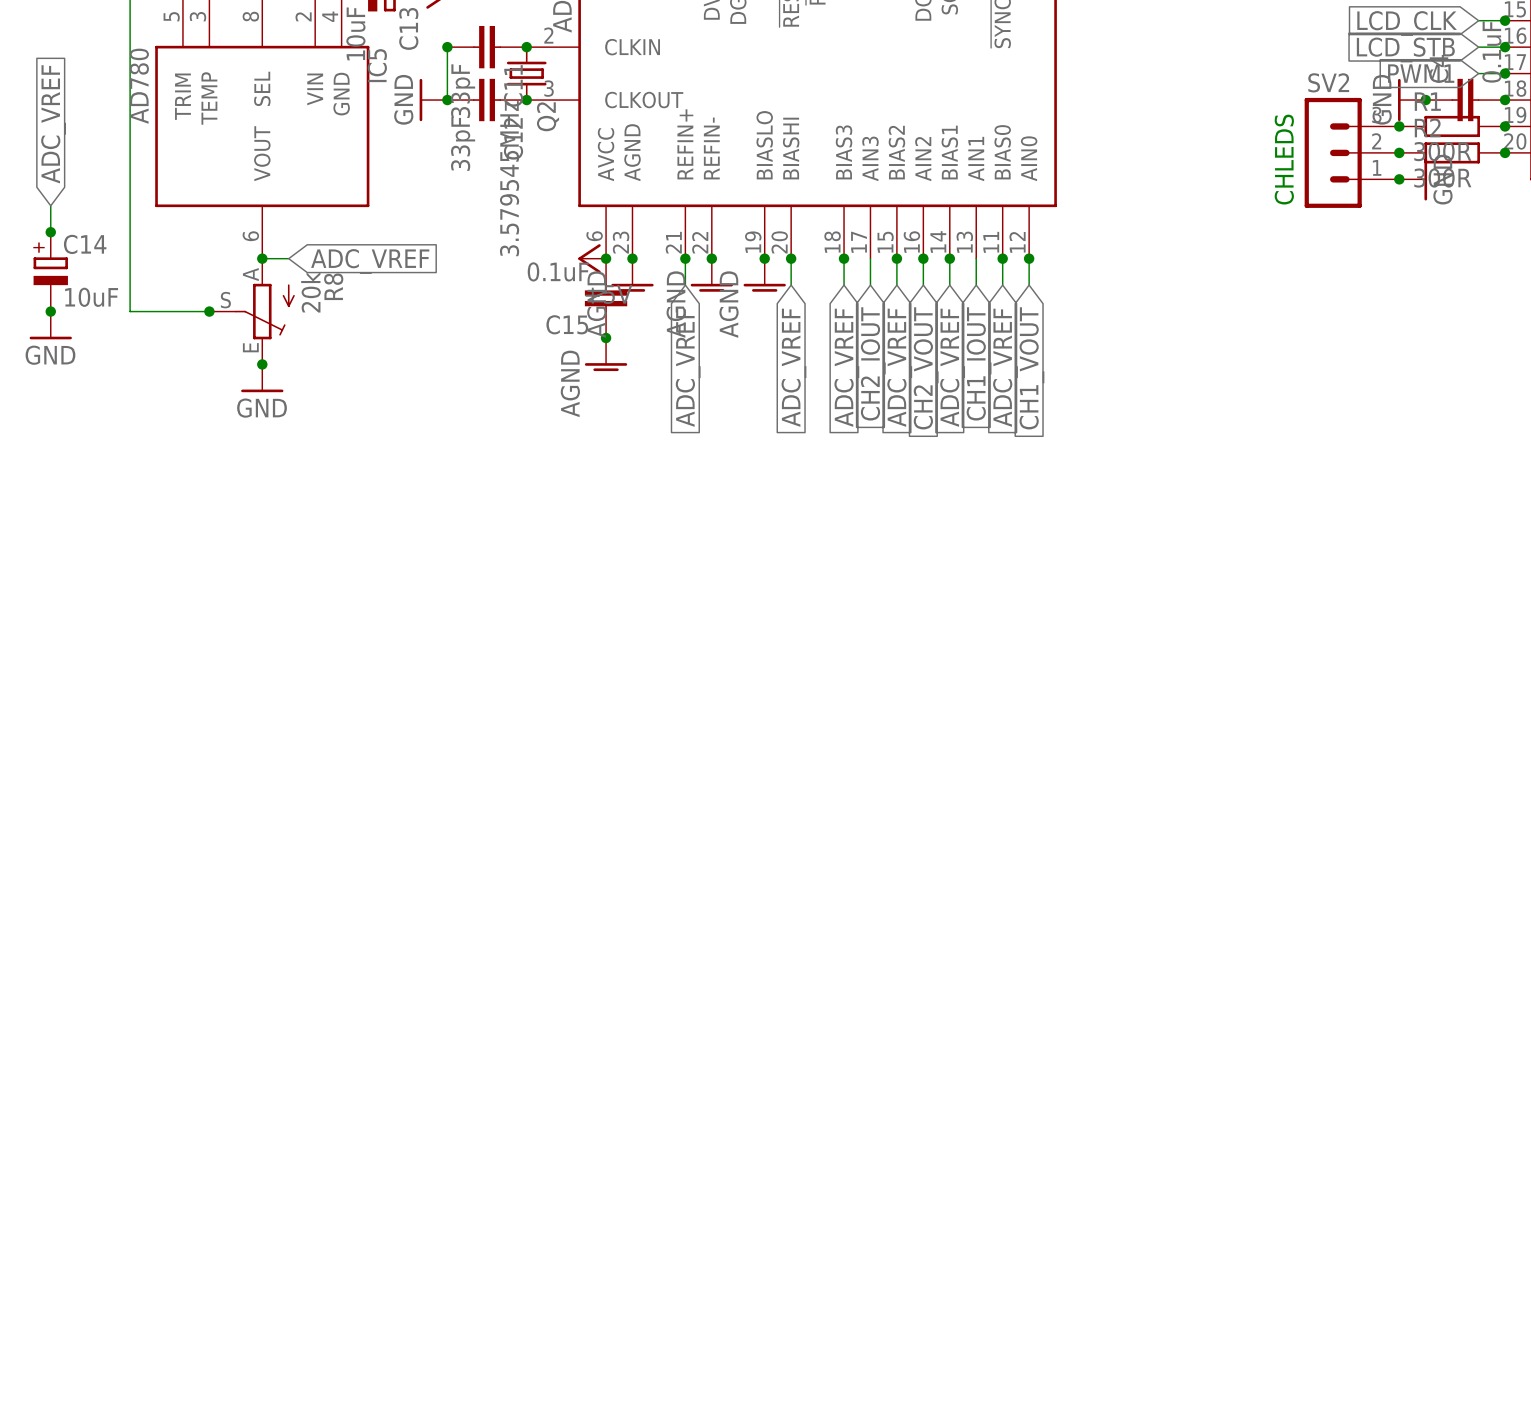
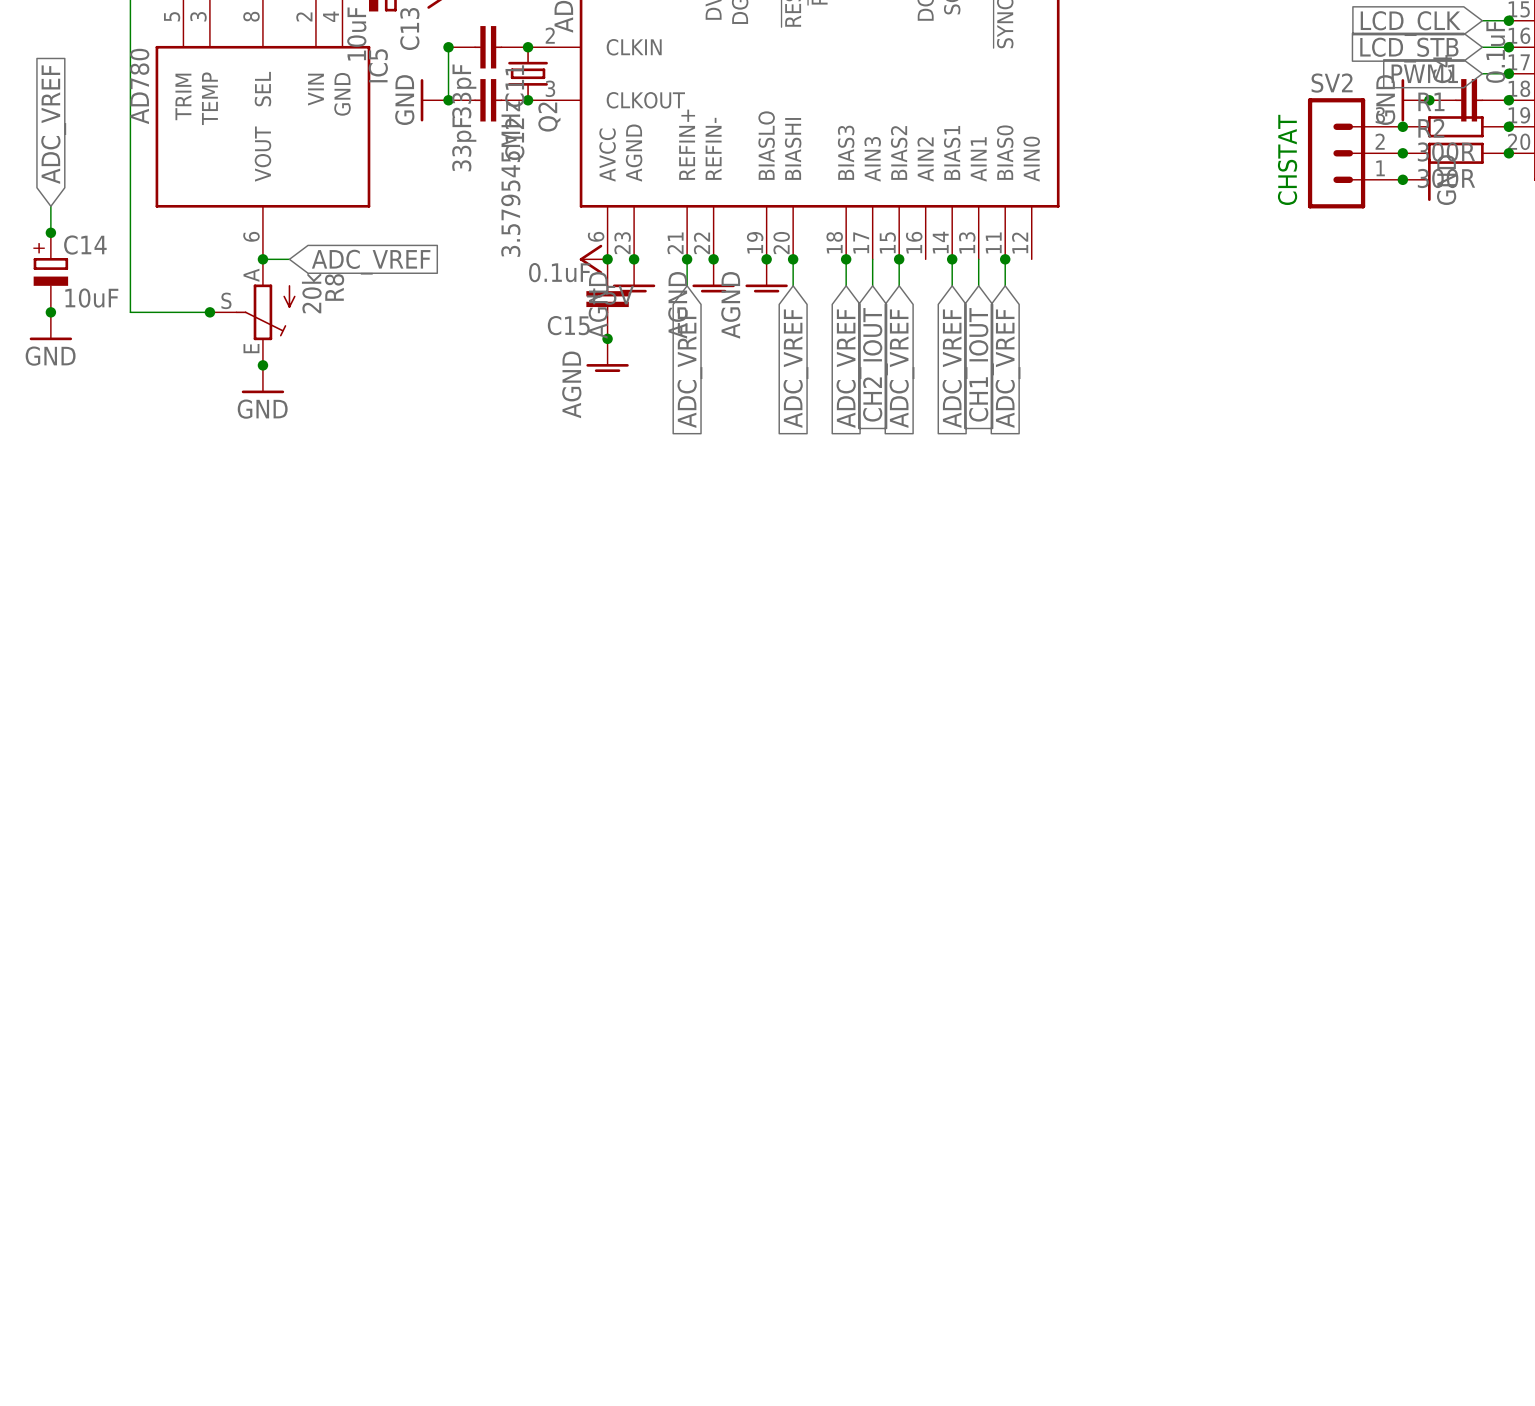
text: CHLEDS (1284, 159) -> CHSTAT (1287, 159)
wire: (923, 258) (923, 285) -> none
junction: (923, 258) -> none
wire: (1029, 258) (1029, 285) -> none
junction: (1029, 258) -> none
global label: CH2_VOUT (926, 368) -> none
global label: CH1_VOUT (1031, 368) -> none

